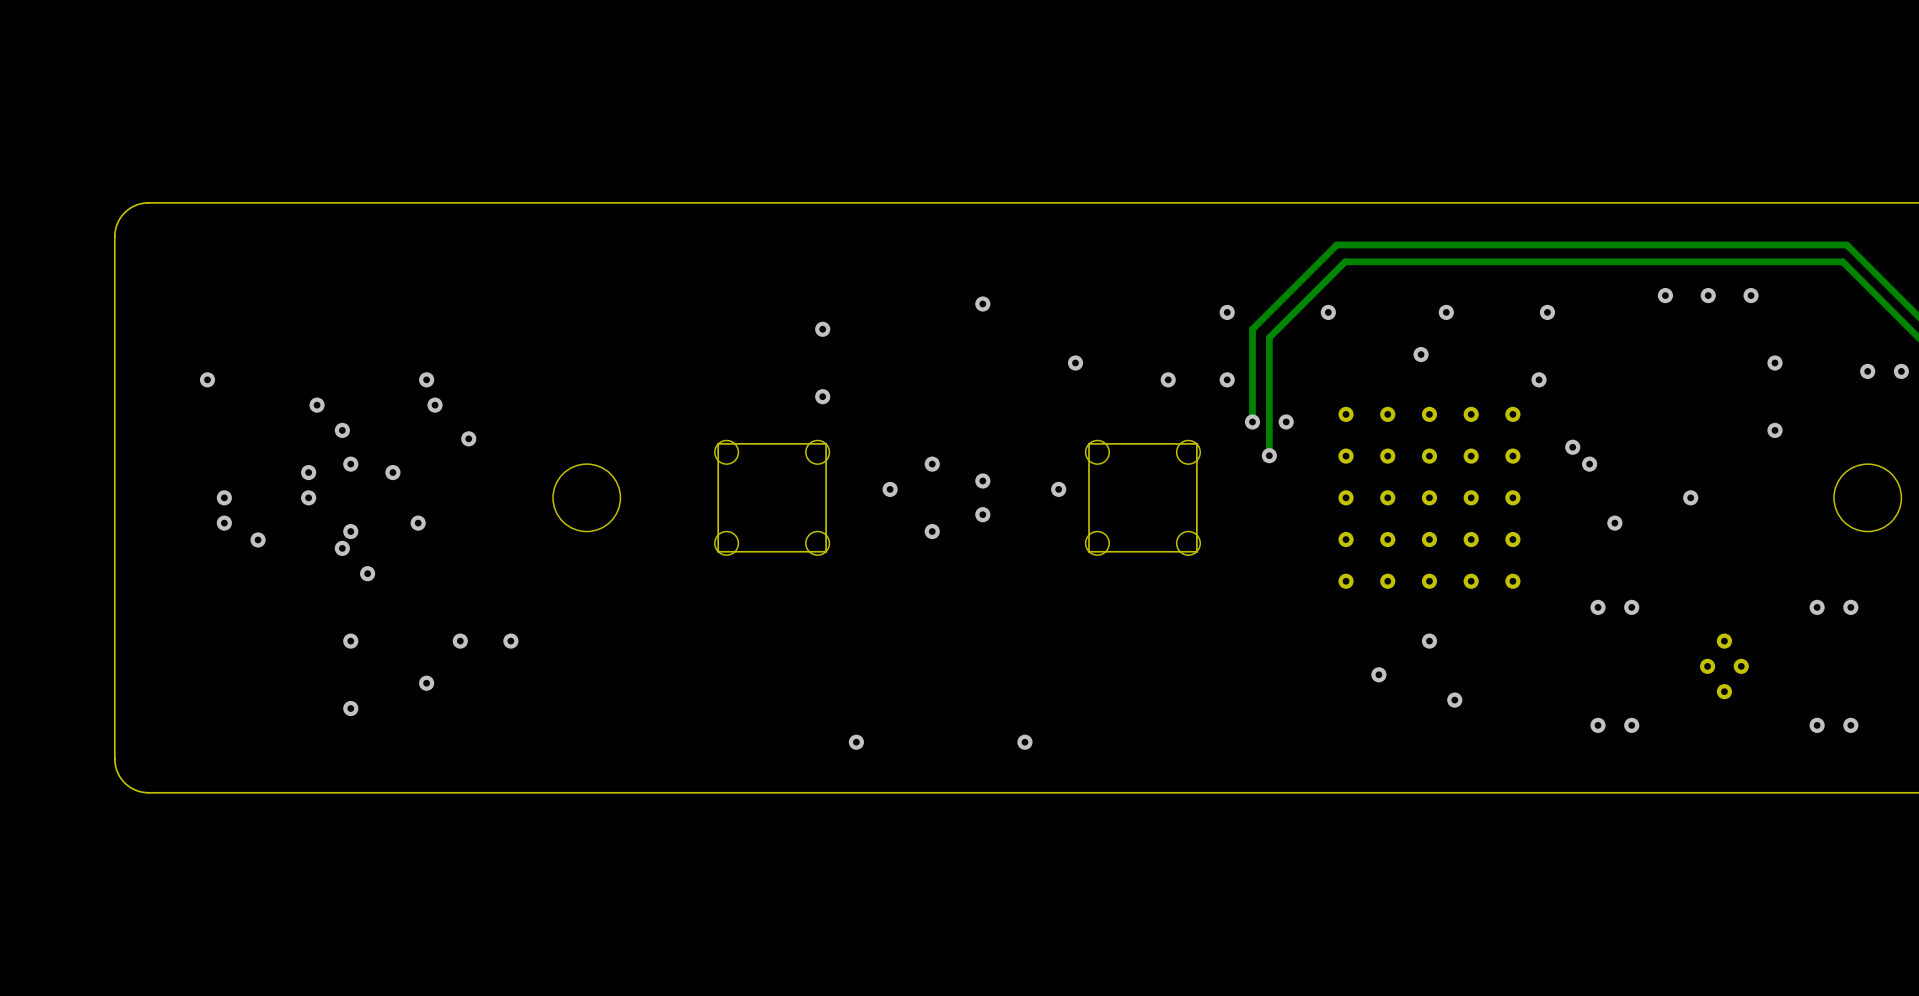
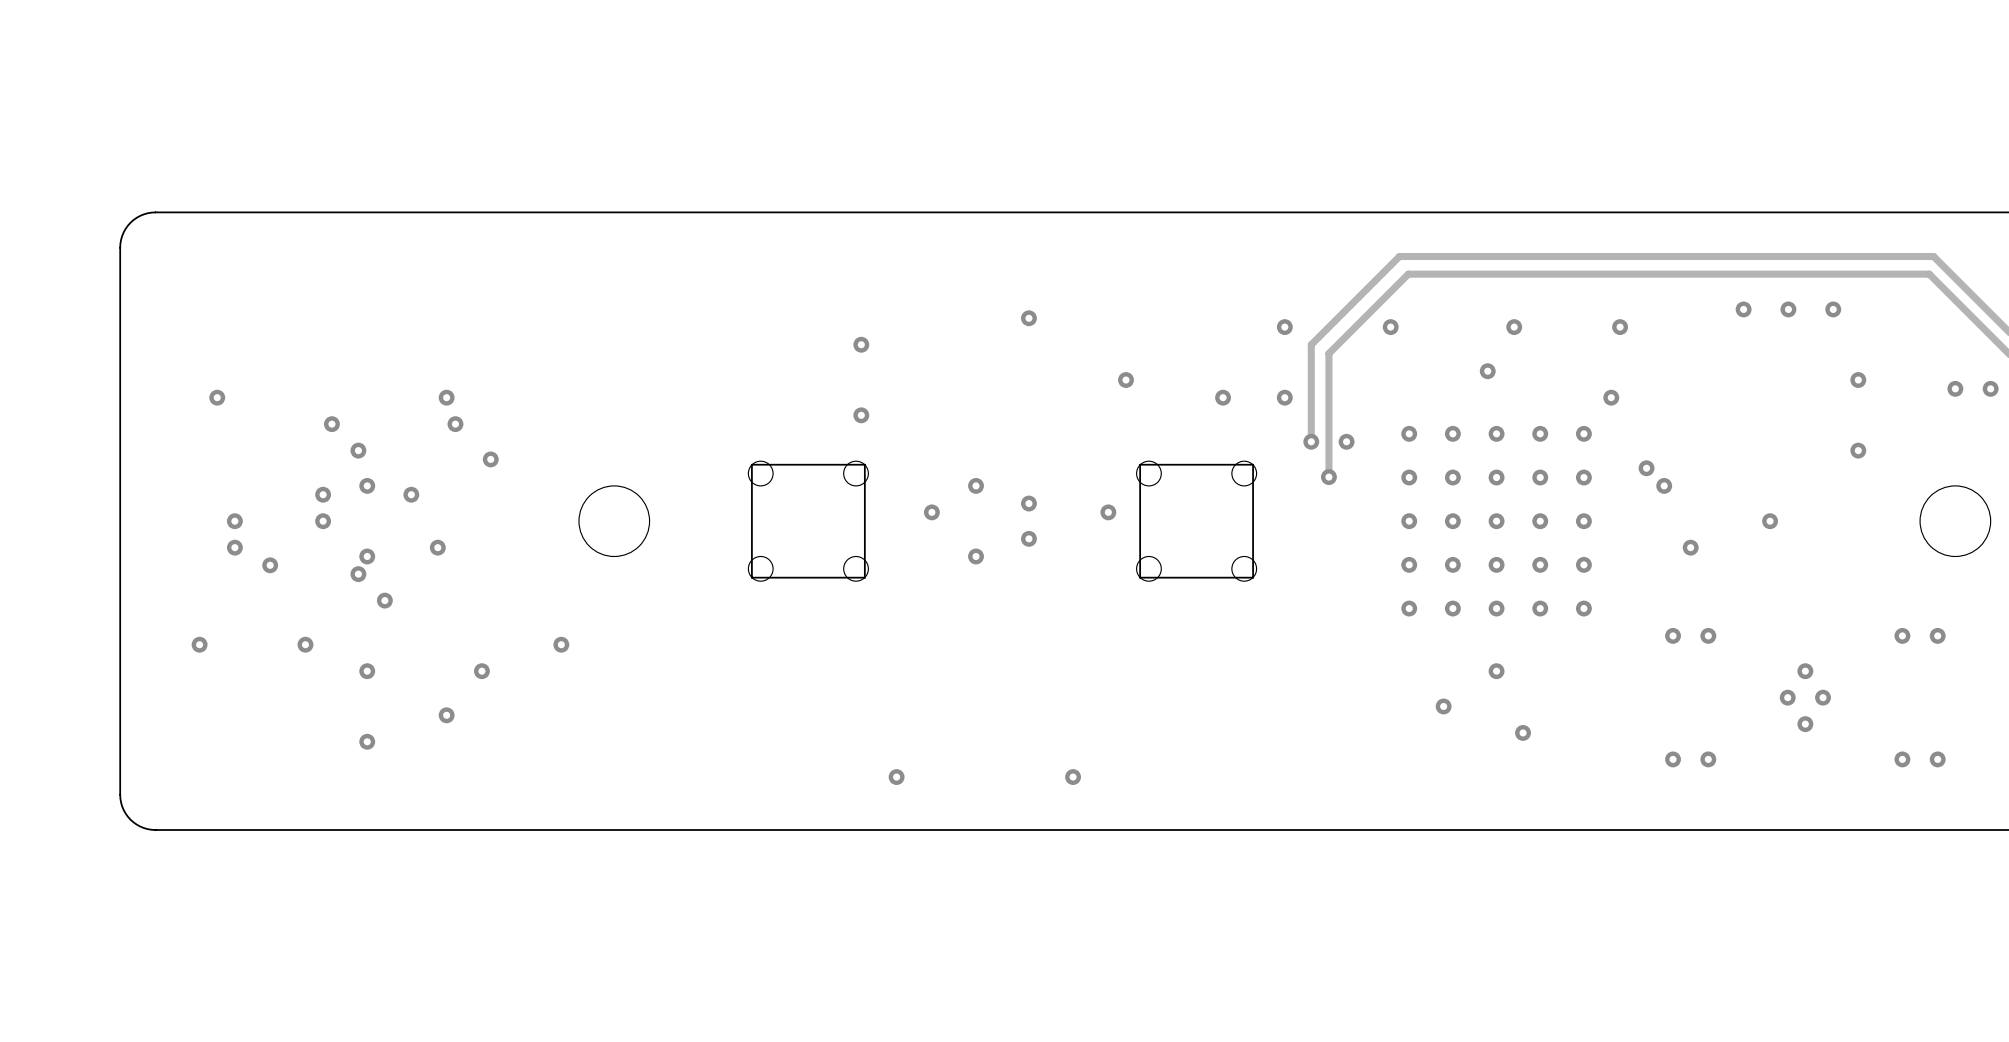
via: none -> (199, 644)
via: none -> (305, 644)
via position: (510, 641) -> (561, 644)

